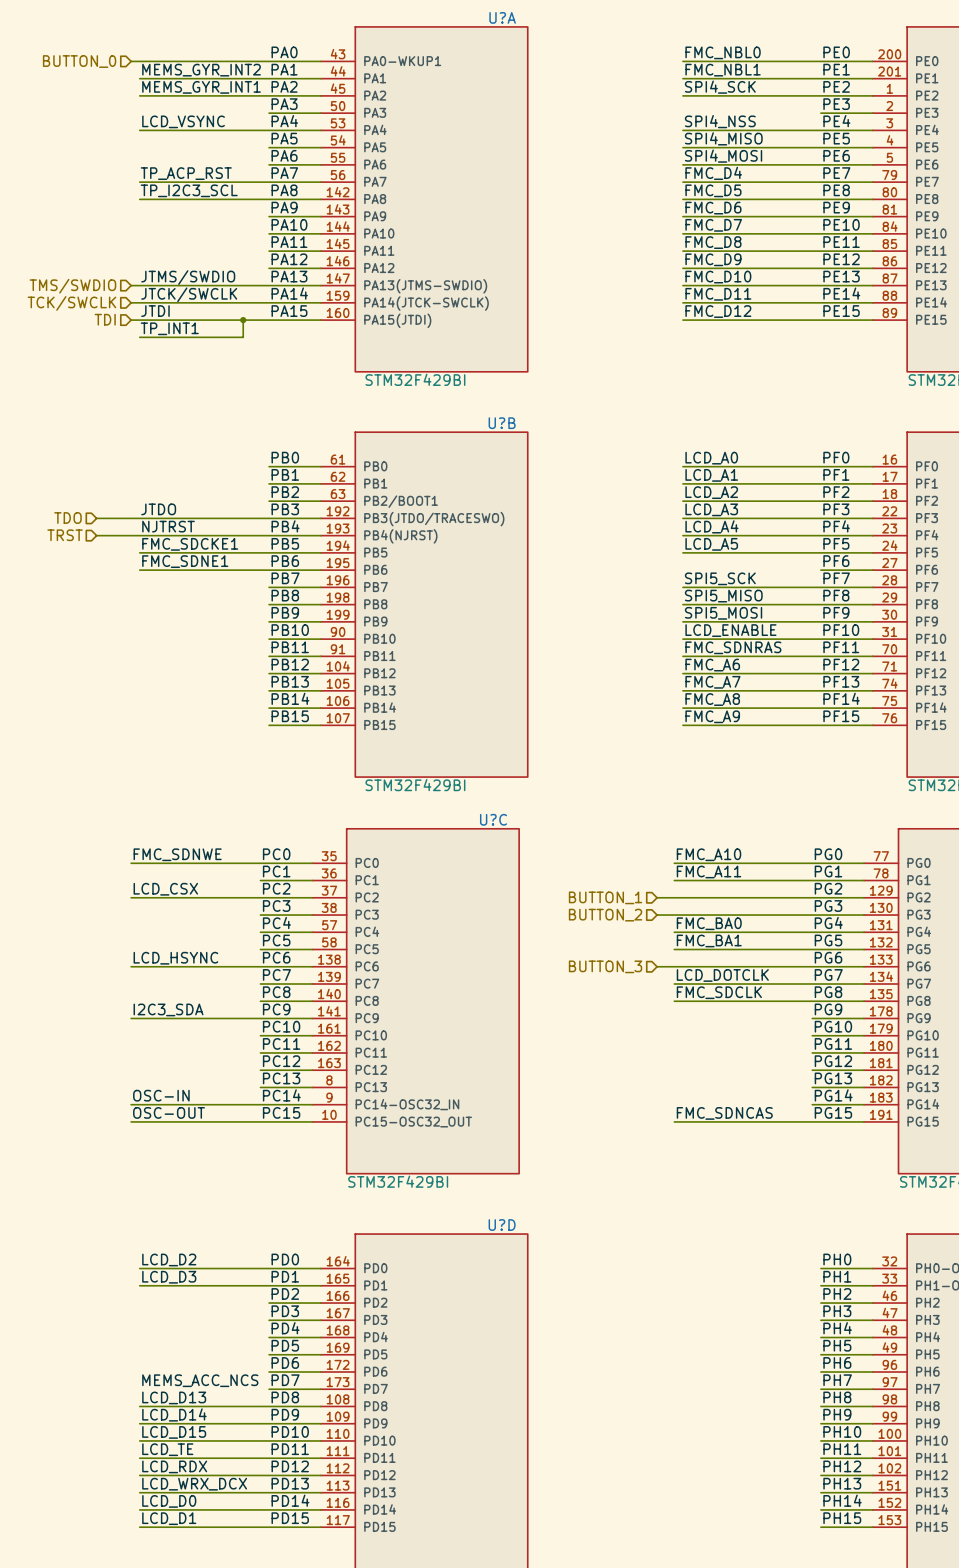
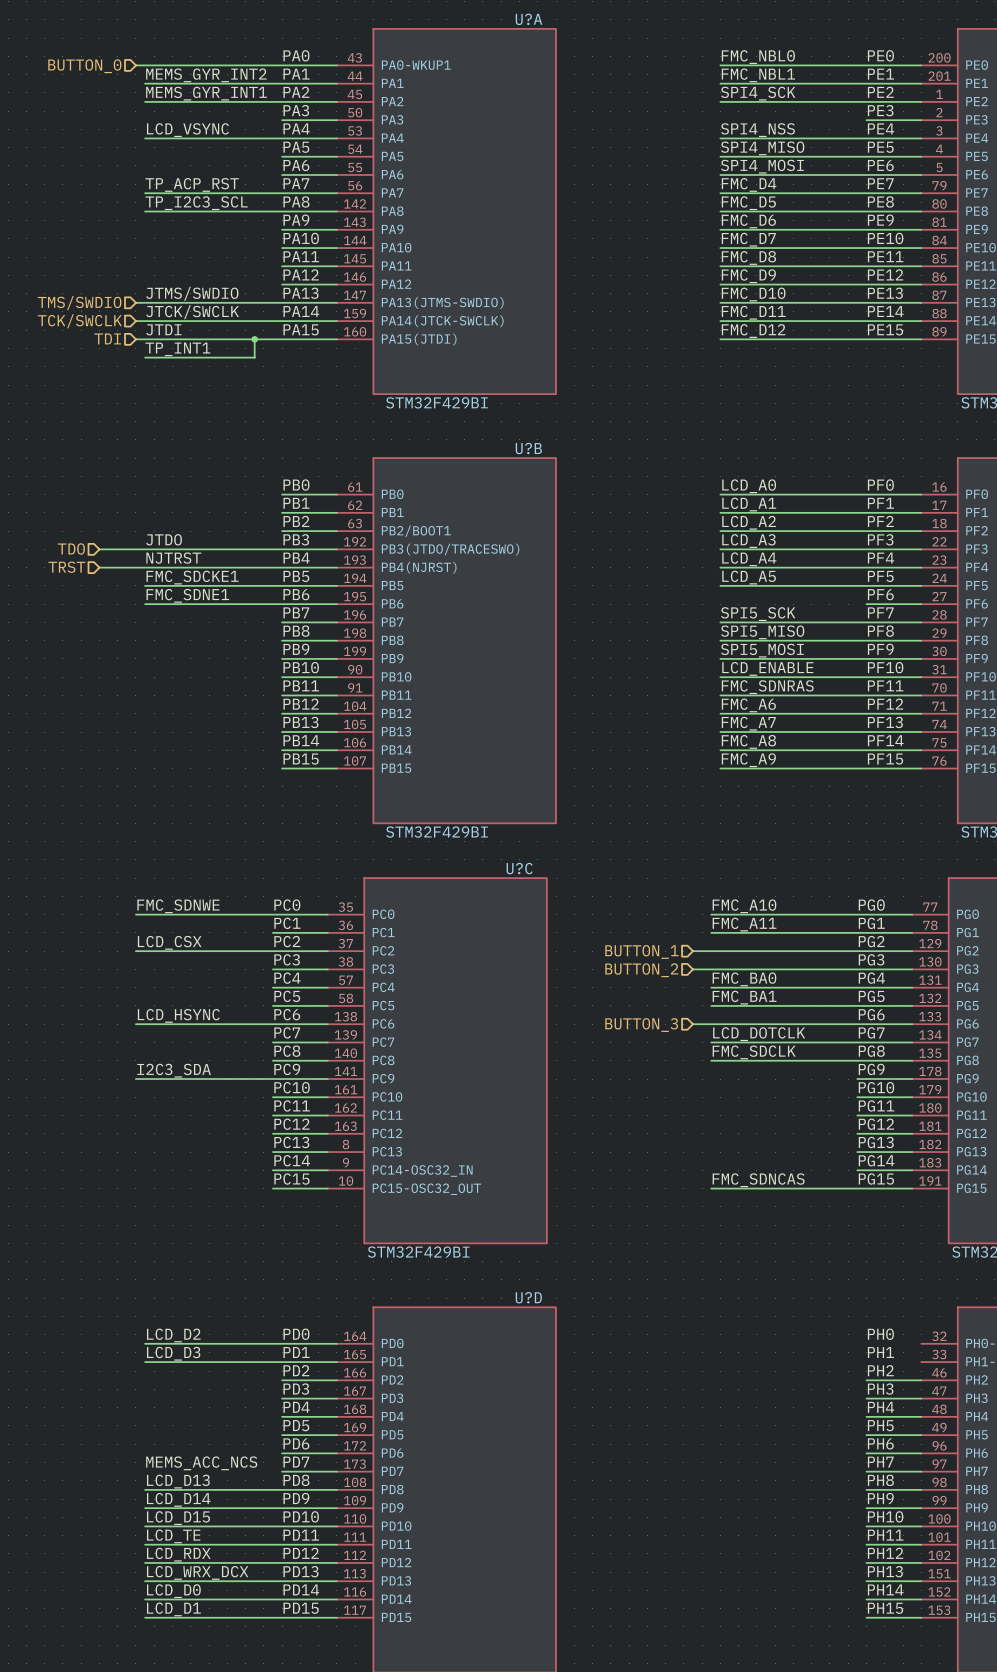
label: OSC-IN (161, 1095) -> none
wire: (131, 1104) (260, 1104) -> none
label: OSC-OUT (169, 1112) -> none
wire: (131, 1121) (260, 1121) -> none
wire: (820, 1268) (872, 1268) -> none
wire: (820, 1285) (872, 1285) -> none

